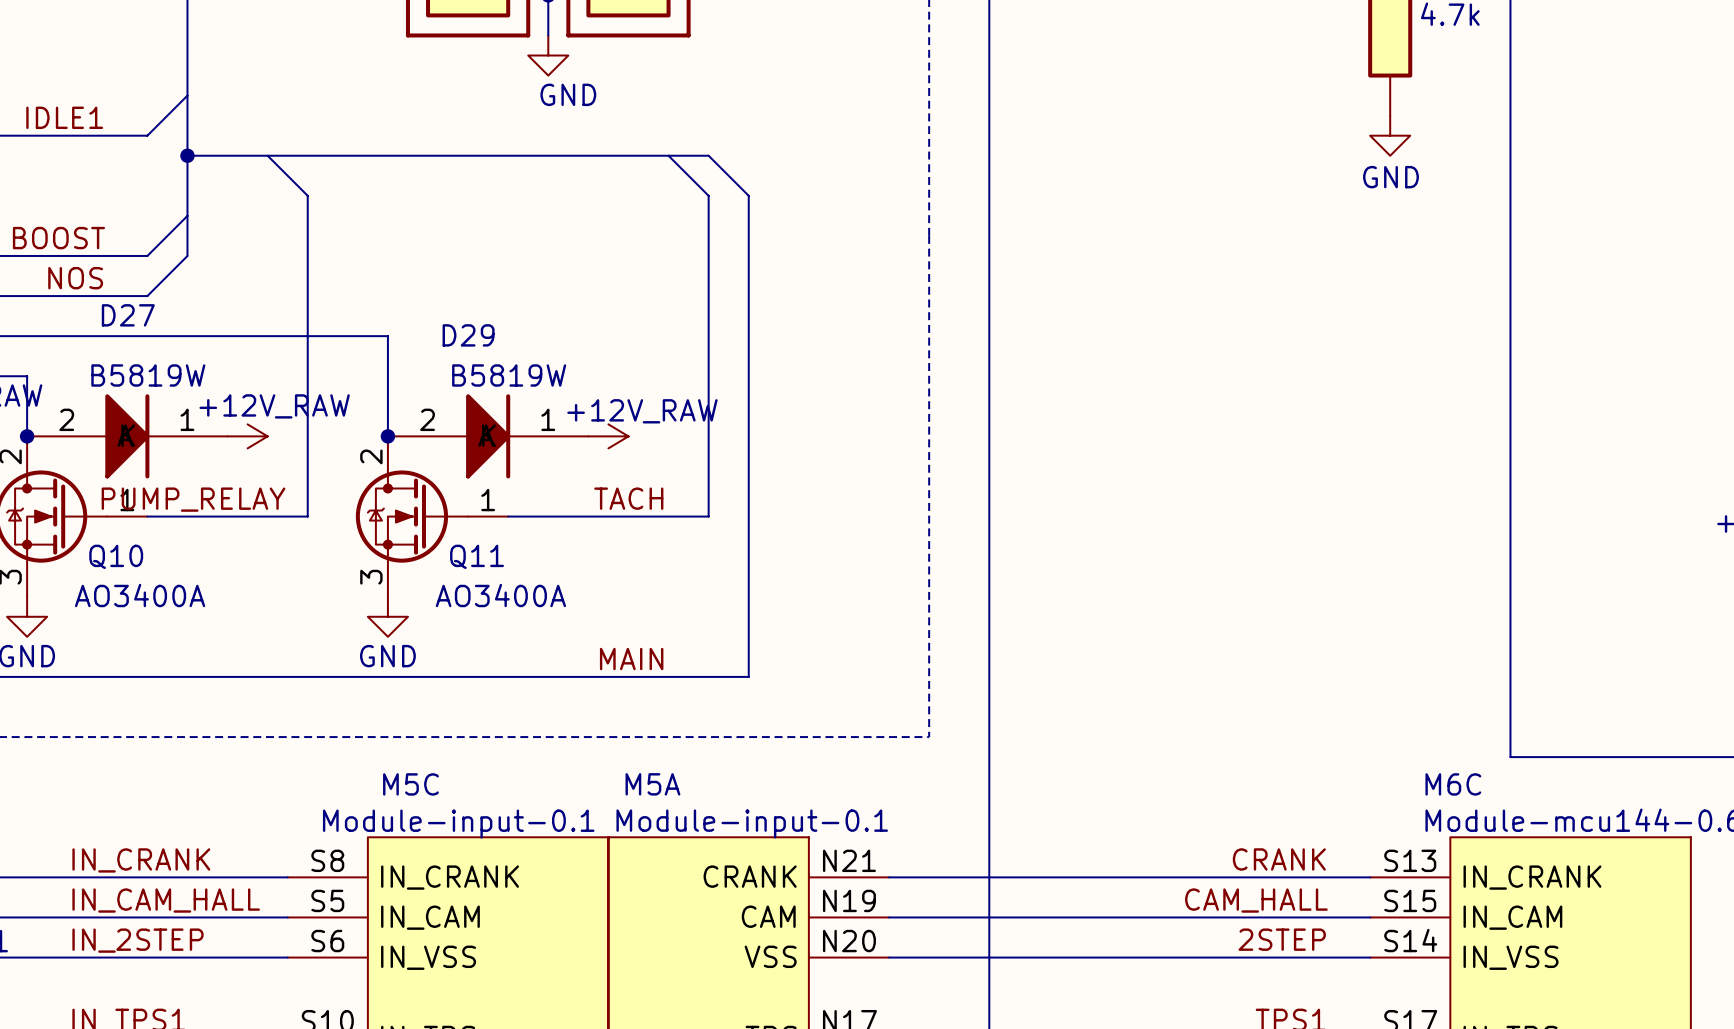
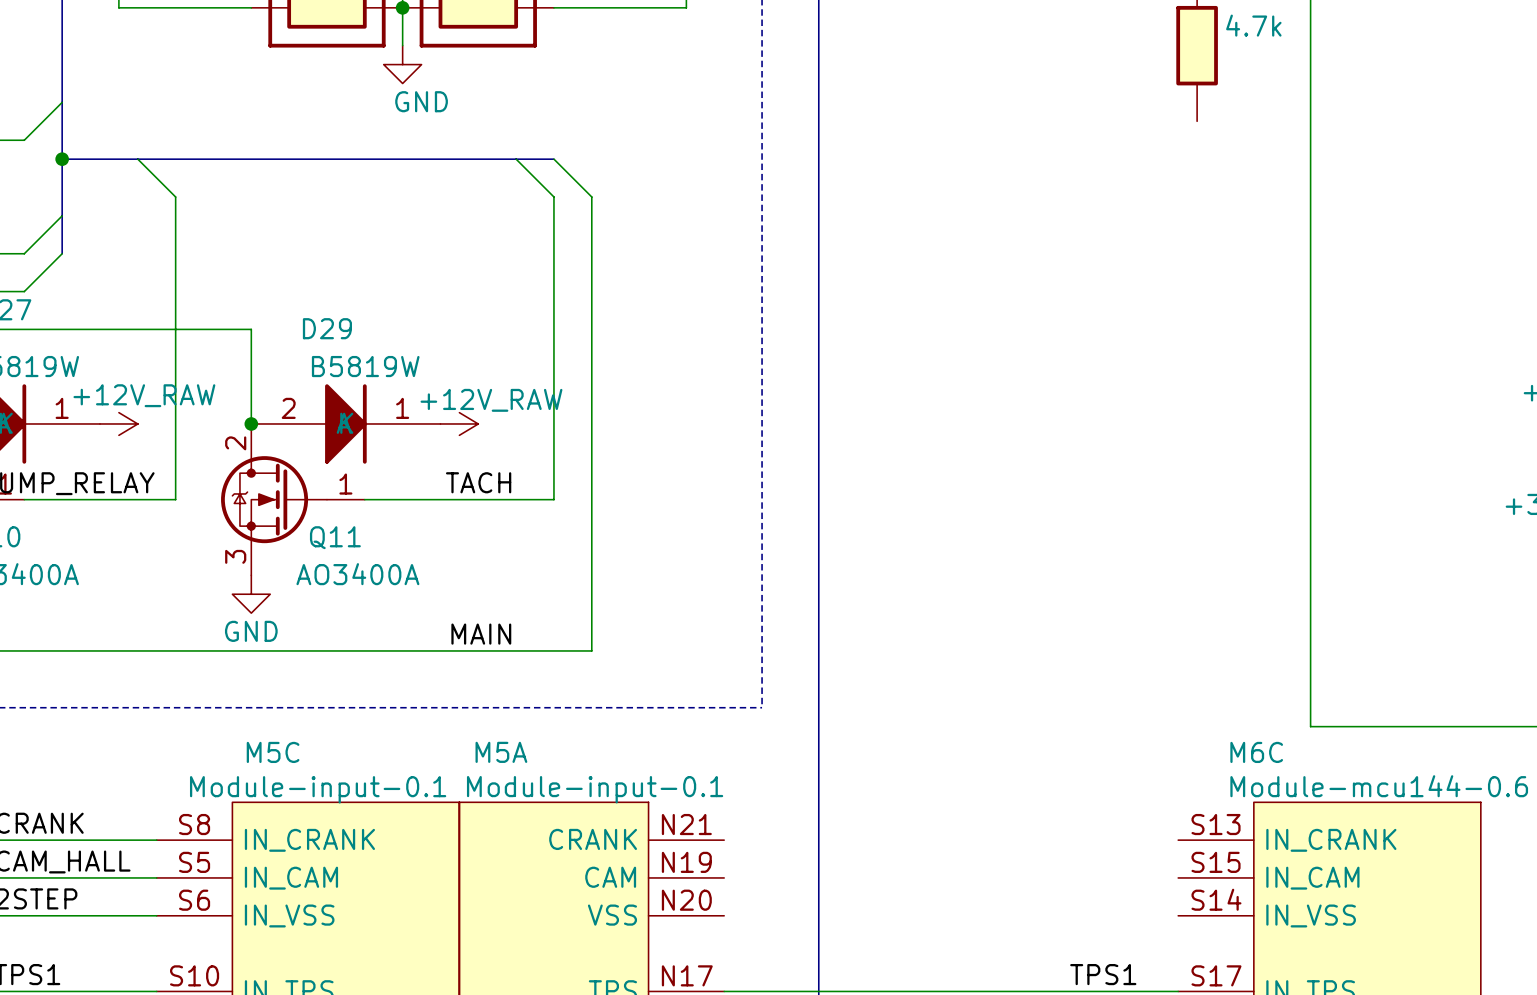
power symbol: GND (1390, 135) -> none
label: CRANK (1279, 859) -> none
wire: (889, 877) (1370, 877) -> none
label: CAM_HALL (1256, 900) -> none
wire: (889, 917) (1370, 917) -> none
label: 2STEP (1282, 939) -> none
wire: (889, 957) (1370, 957) -> none

